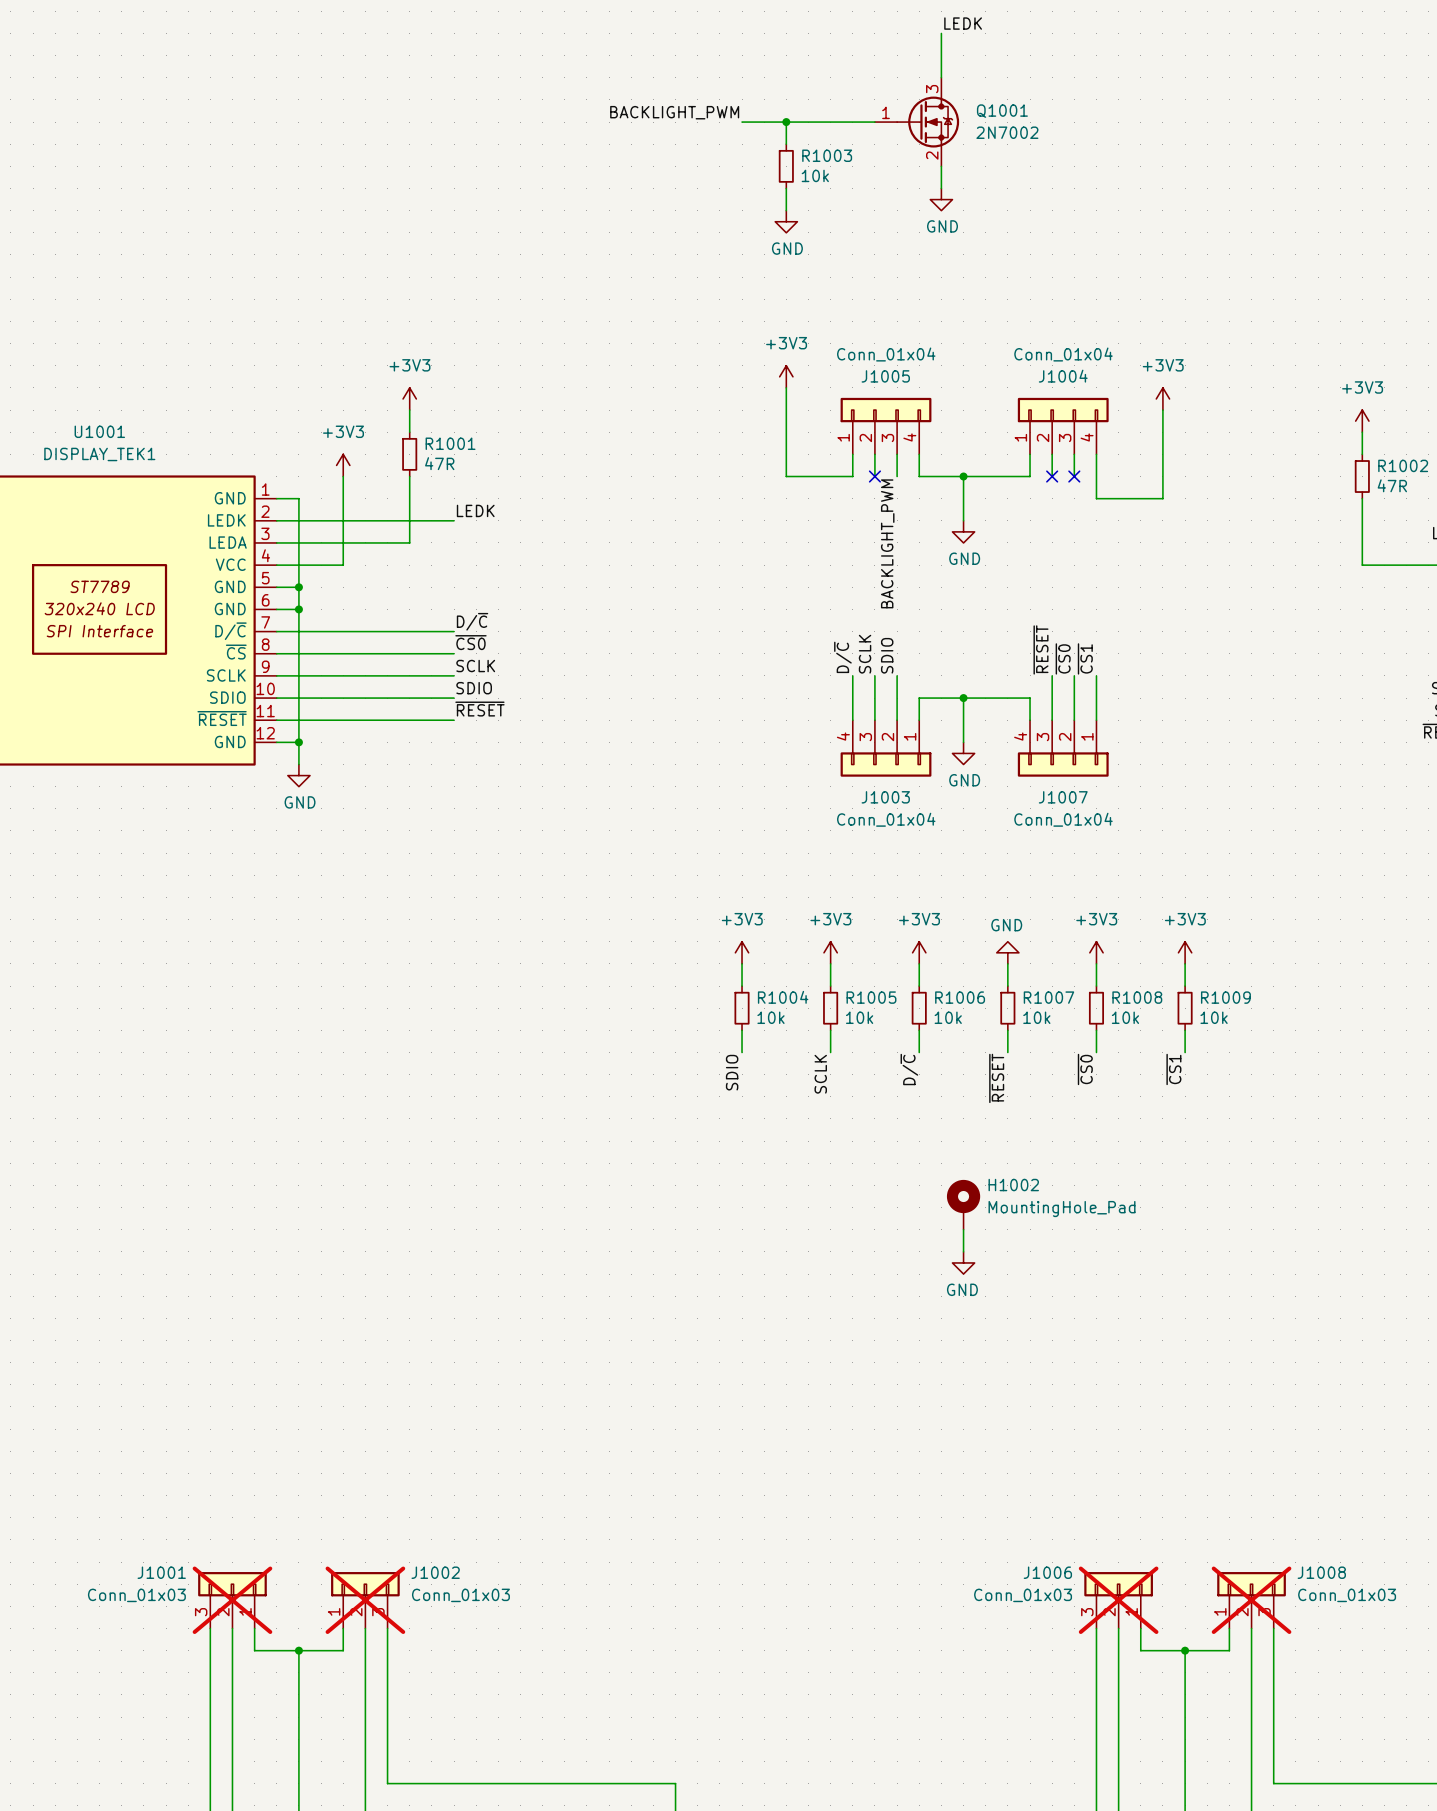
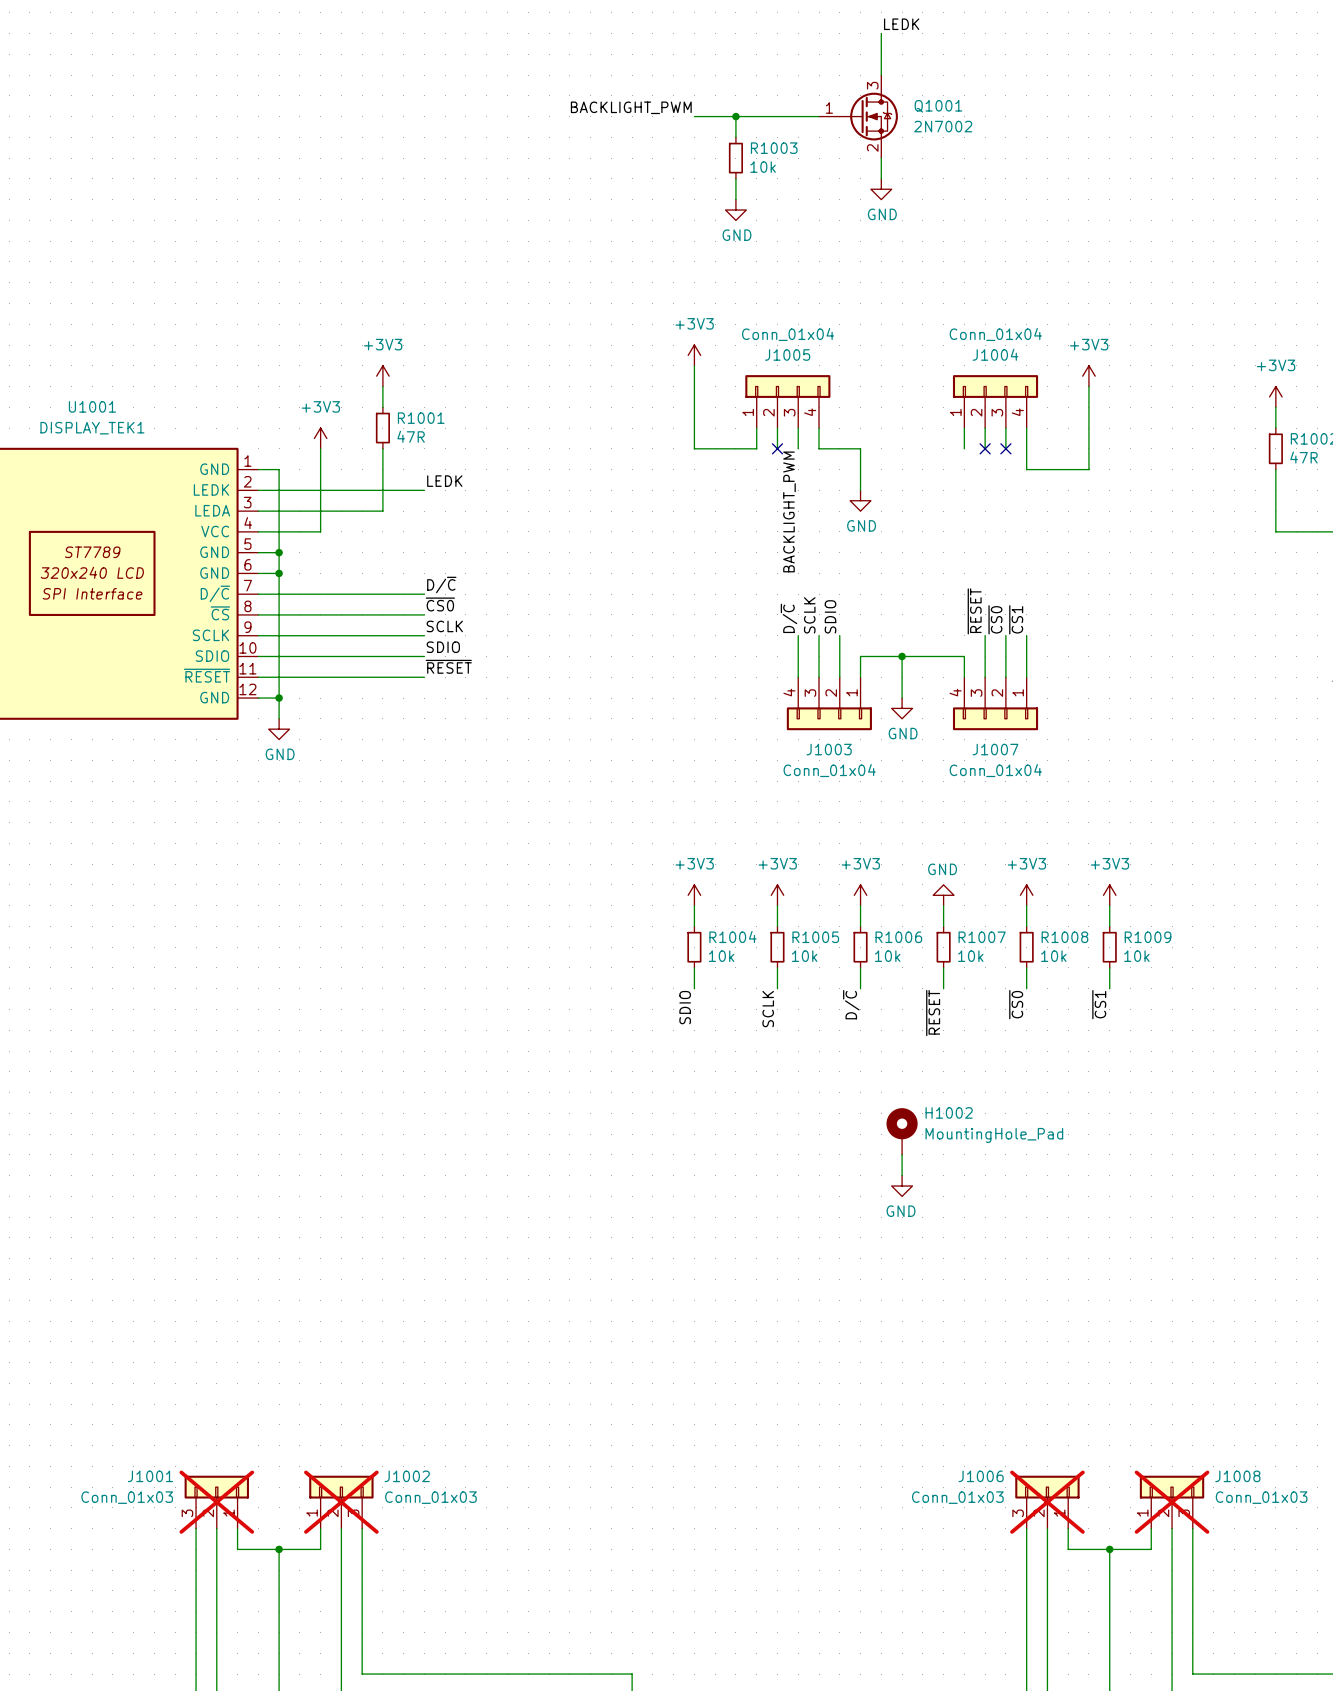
power symbol position: +3V3 (786, 376) -> +3V3 (694, 355)
wire: (786, 387) (786, 476) -> (694, 365) (694, 448) (735, 448)
J1005 position: (886, 426) -> (787, 401)
wire: (897, 454) (897, 476) -> (777, 428) (777, 448)
wire: (919, 454) (919, 476) (1030, 476) -> none
wire: (808, 476) (852, 476) -> (756, 448) (756, 428)
wire: none -> (819, 448) (860, 448) (860, 490)
no-connect mark position: (874, 476) -> (777, 448)
wire: (963, 476) (963, 520) -> none
junction: (963, 476) -> none
power symbol position: GND (963, 531) -> GND (860, 500)
label position: BACKLIGHT_PWM (887, 543) -> BACKLIGHT_PWM (789, 511)

